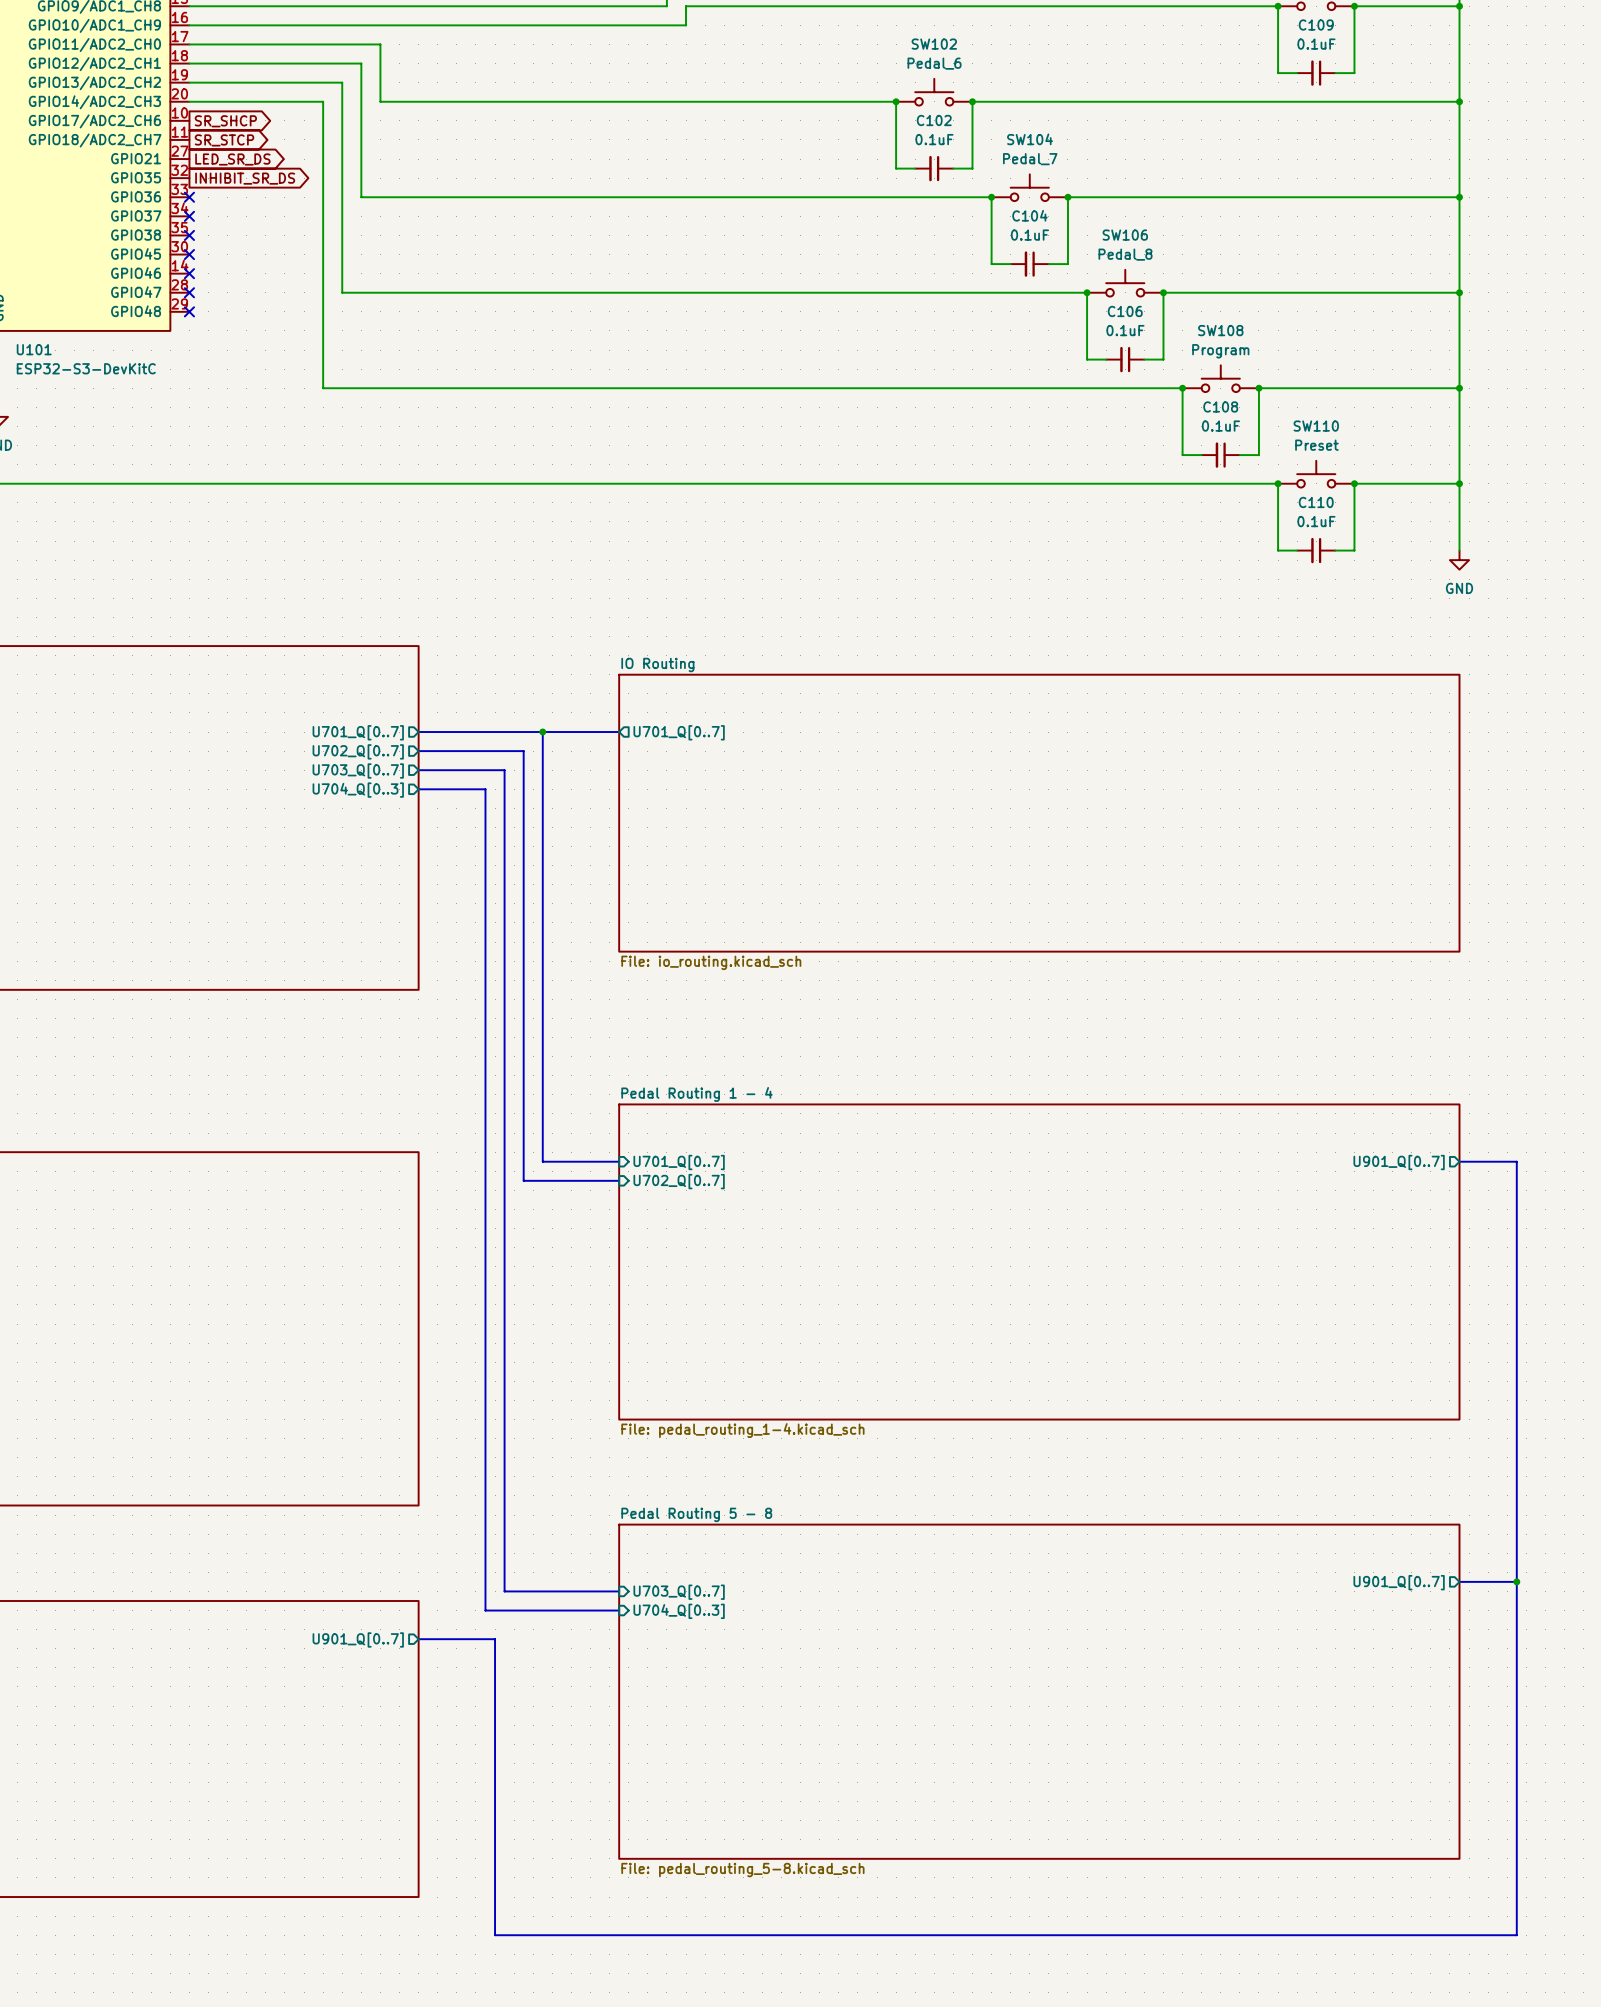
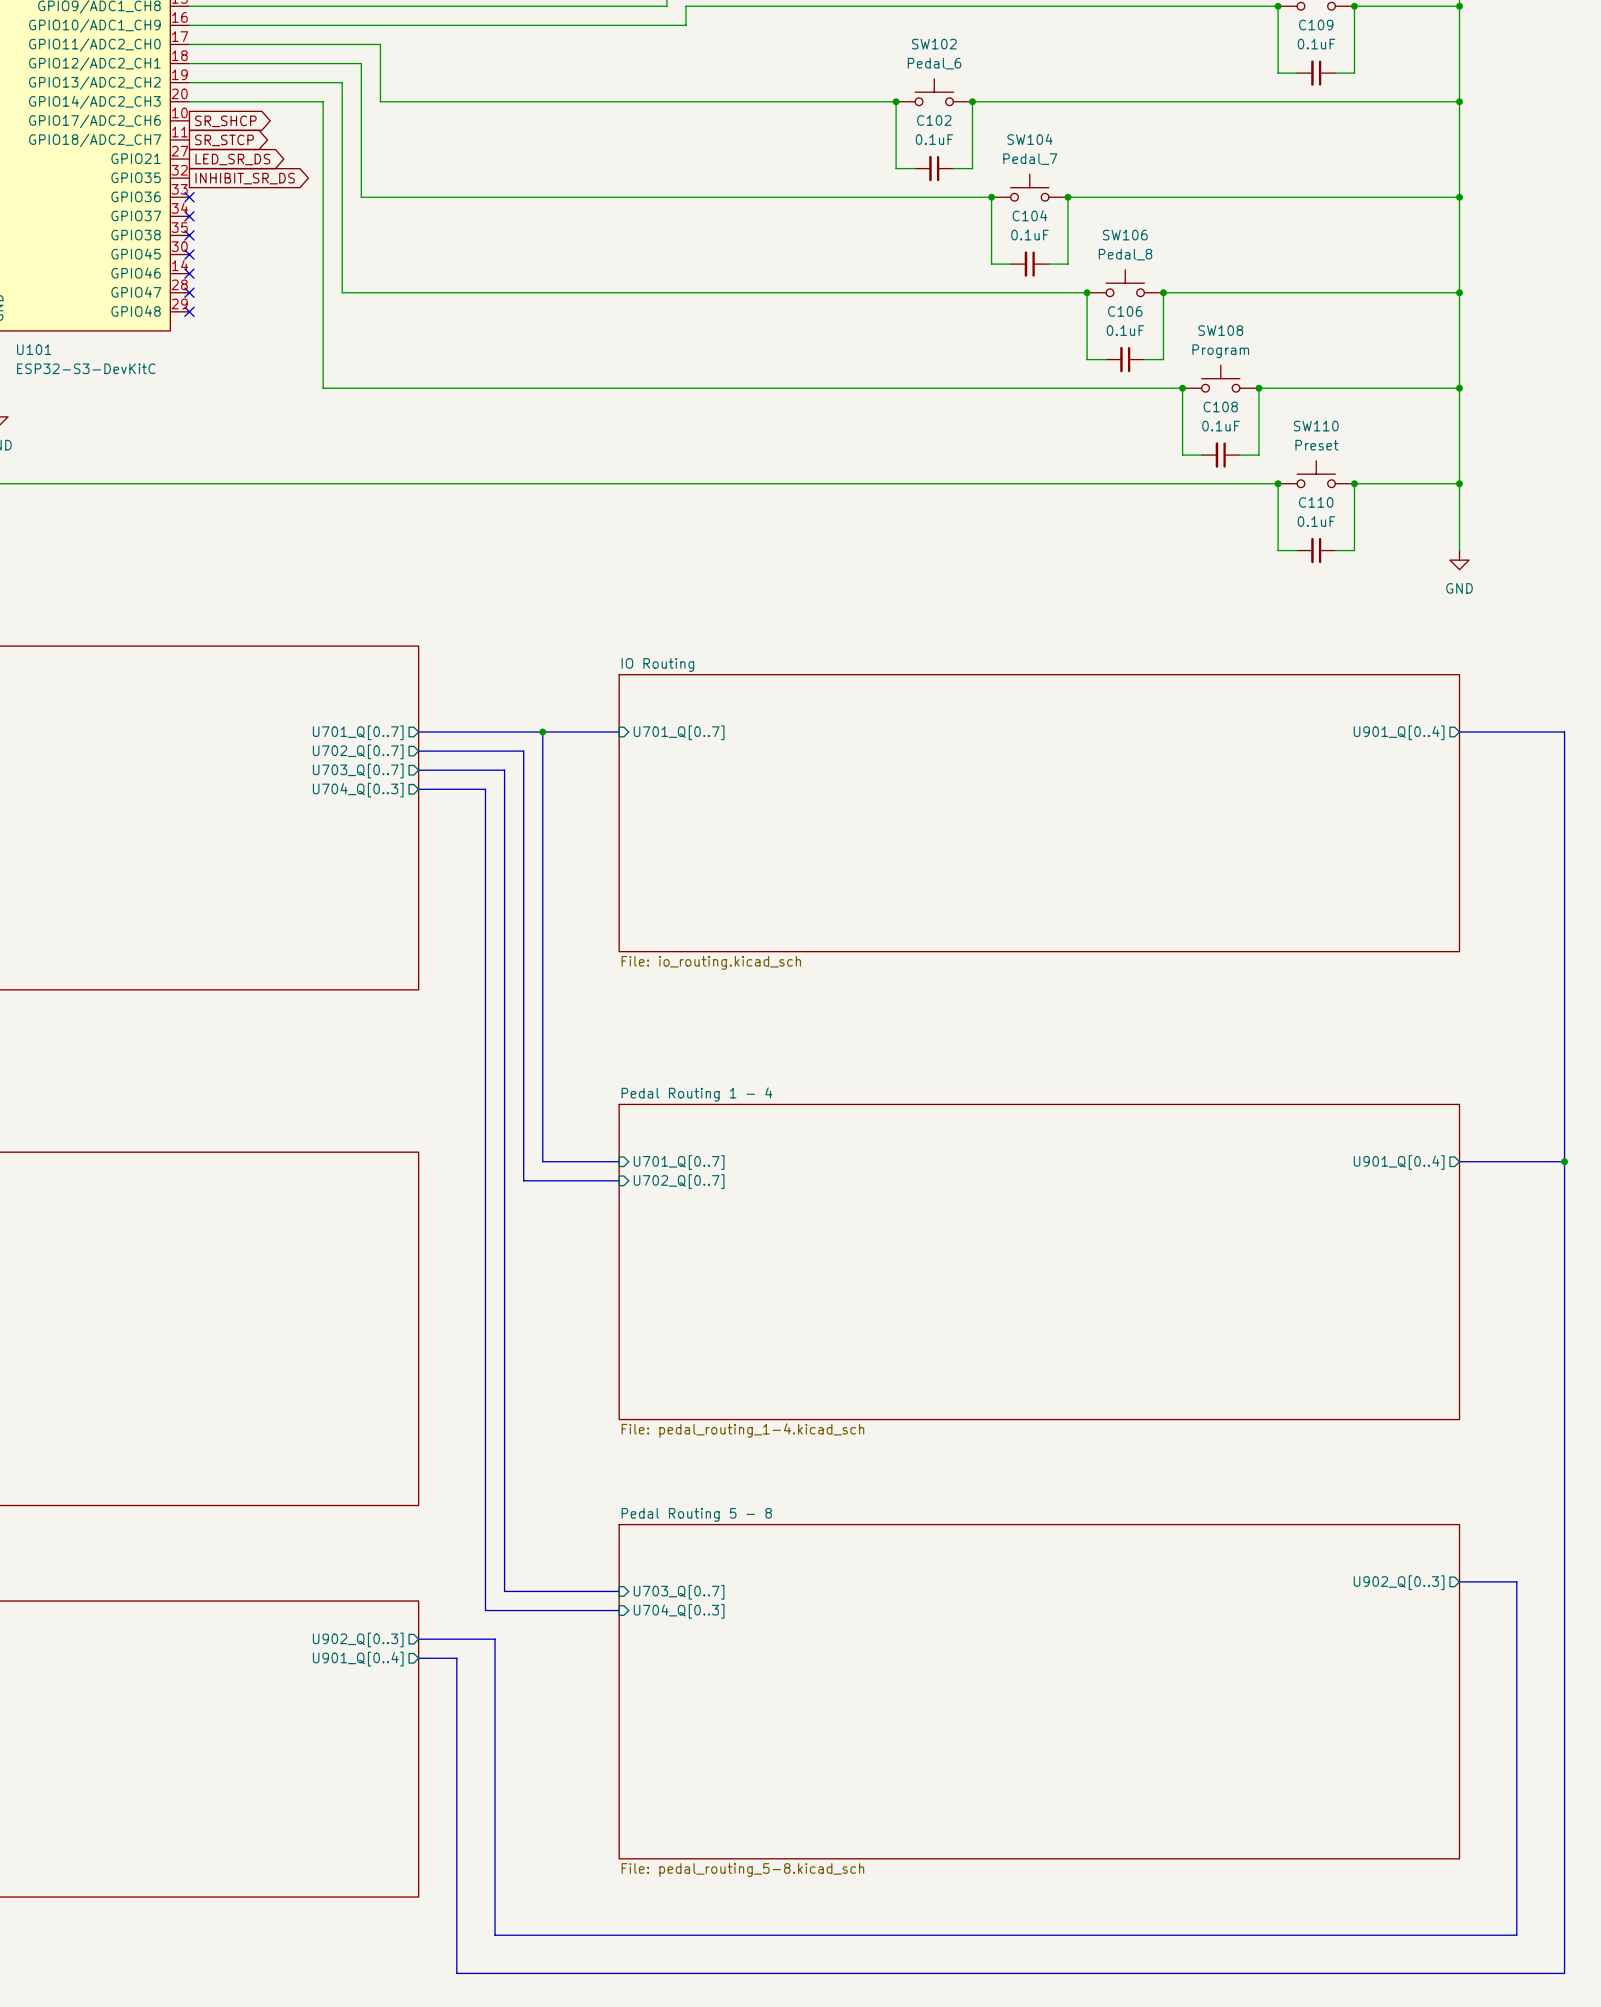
sheet pin shape: output (679, 732) -> input (679, 732)
sheet pin: none -> U901_Q[0..4] (1399, 732)
bus: none -> (1459, 732) (1564, 732) (1564, 1973) (456, 1973) (456, 1658) (418, 1658)
bus: (1516, 1161) (1516, 1581) -> (1516, 1161) (1564, 1161)
junction: none -> (1564, 1161)
sheet pin: U901_Q[0..7] (1399, 1162) -> U901_Q[0..4] (1399, 1162)
junction: (1516, 1581) -> none
sheet pin: U901_Q[0..7] (1399, 1582) -> U902_Q[0..3] (1399, 1582)
sheet pin: U901_Q[0..7] (358, 1639) -> U902_Q[0..3] (358, 1639)
sheet pin: none -> U901_Q[0..4] (358, 1659)

